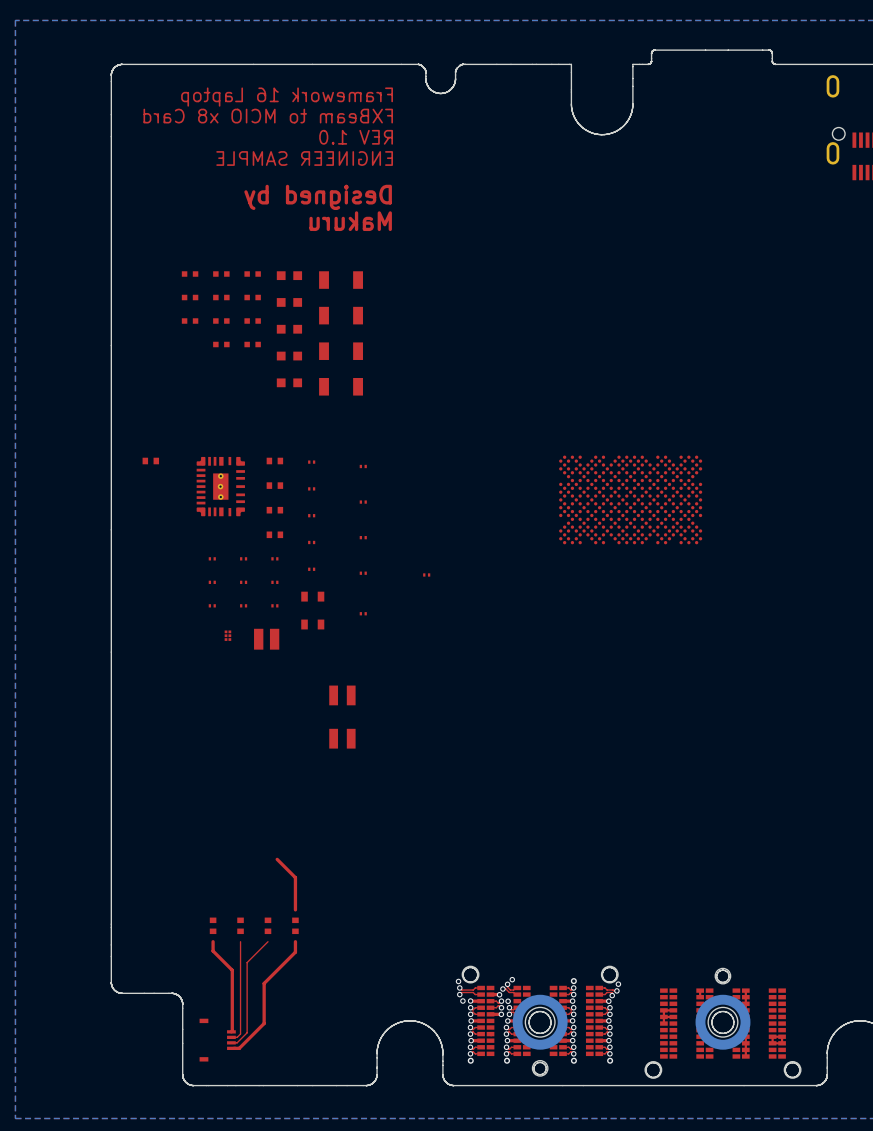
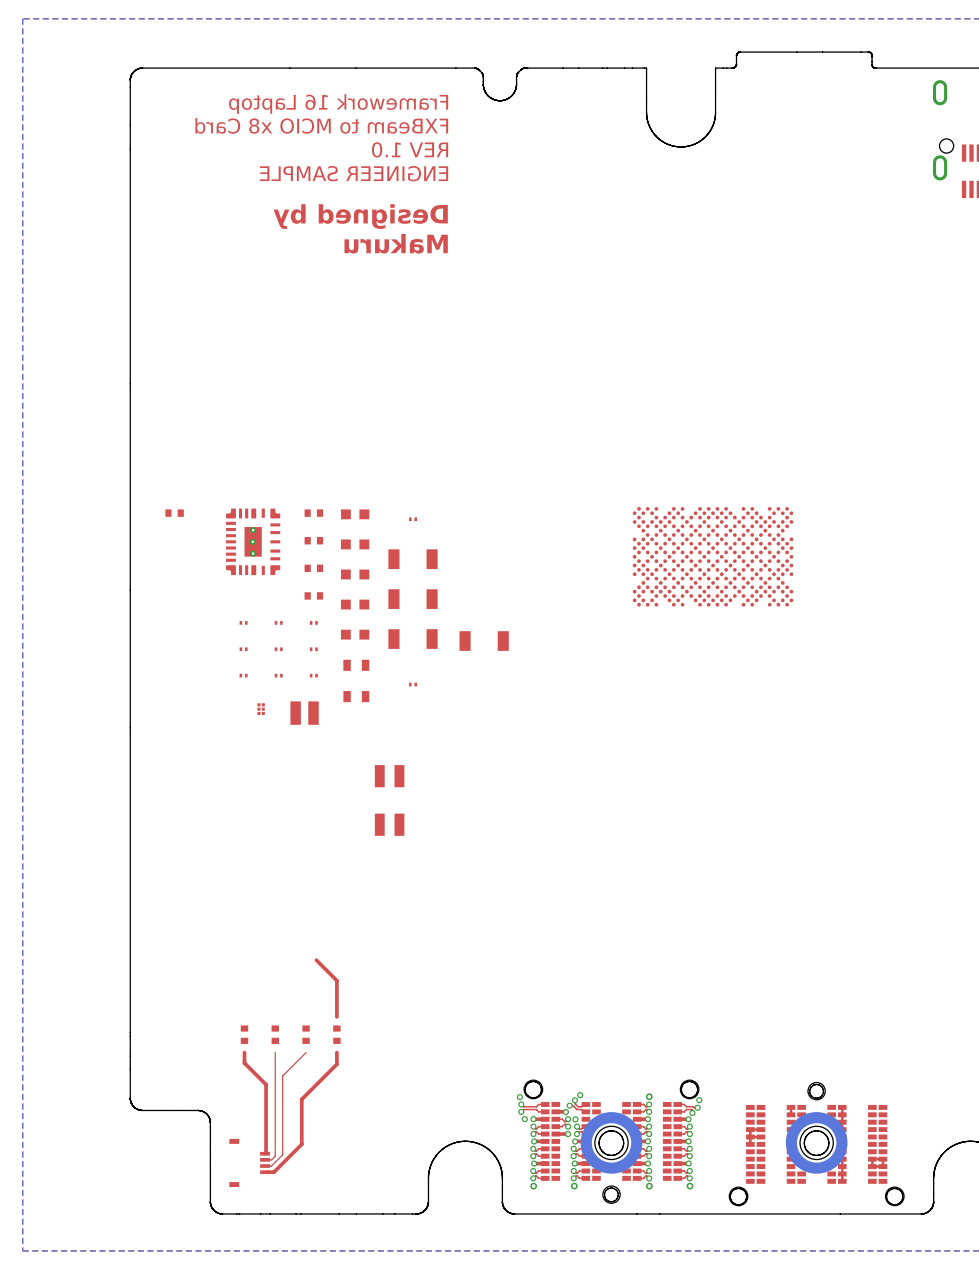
part: (190, 274) -> none
part: (221, 274) -> none
part: (252, 274) -> none
part: (289, 275) -> none
part: (341, 280) -> none
part: (190, 297) -> none
part: (221, 297) -> none
part: (252, 297) -> none
part: (289, 302) -> none
part: (341, 315) -> none
part: (190, 321) -> none
part: (221, 321) -> none
part: (252, 321) -> none
part: (289, 329) -> none
part: (221, 344) -> none
part: (252, 344) -> none
part: (341, 351) -> none
part: (289, 356) -> none
part: (289, 382) -> none
part: (341, 386) -> none
part footprint: [308, 460, 316, 464] -> [340, 509, 370, 520]
part footprint: [308, 487, 316, 491] -> [340, 539, 370, 550]
part footprint: [359, 500, 367, 504] -> [388, 549, 438, 570]
part footprint: [308, 514, 316, 518] -> [340, 569, 370, 580]
part footprint: [359, 536, 367, 540] -> [388, 589, 438, 609]
part footprint: [308, 540, 316, 545] -> [340, 599, 370, 610]
part footprint: [308, 567, 316, 571] -> [340, 629, 370, 640]
part footprint: [359, 571, 367, 575] -> [388, 629, 438, 649]
part footprint: [423, 573, 431, 577] -> [459, 631, 509, 651]

